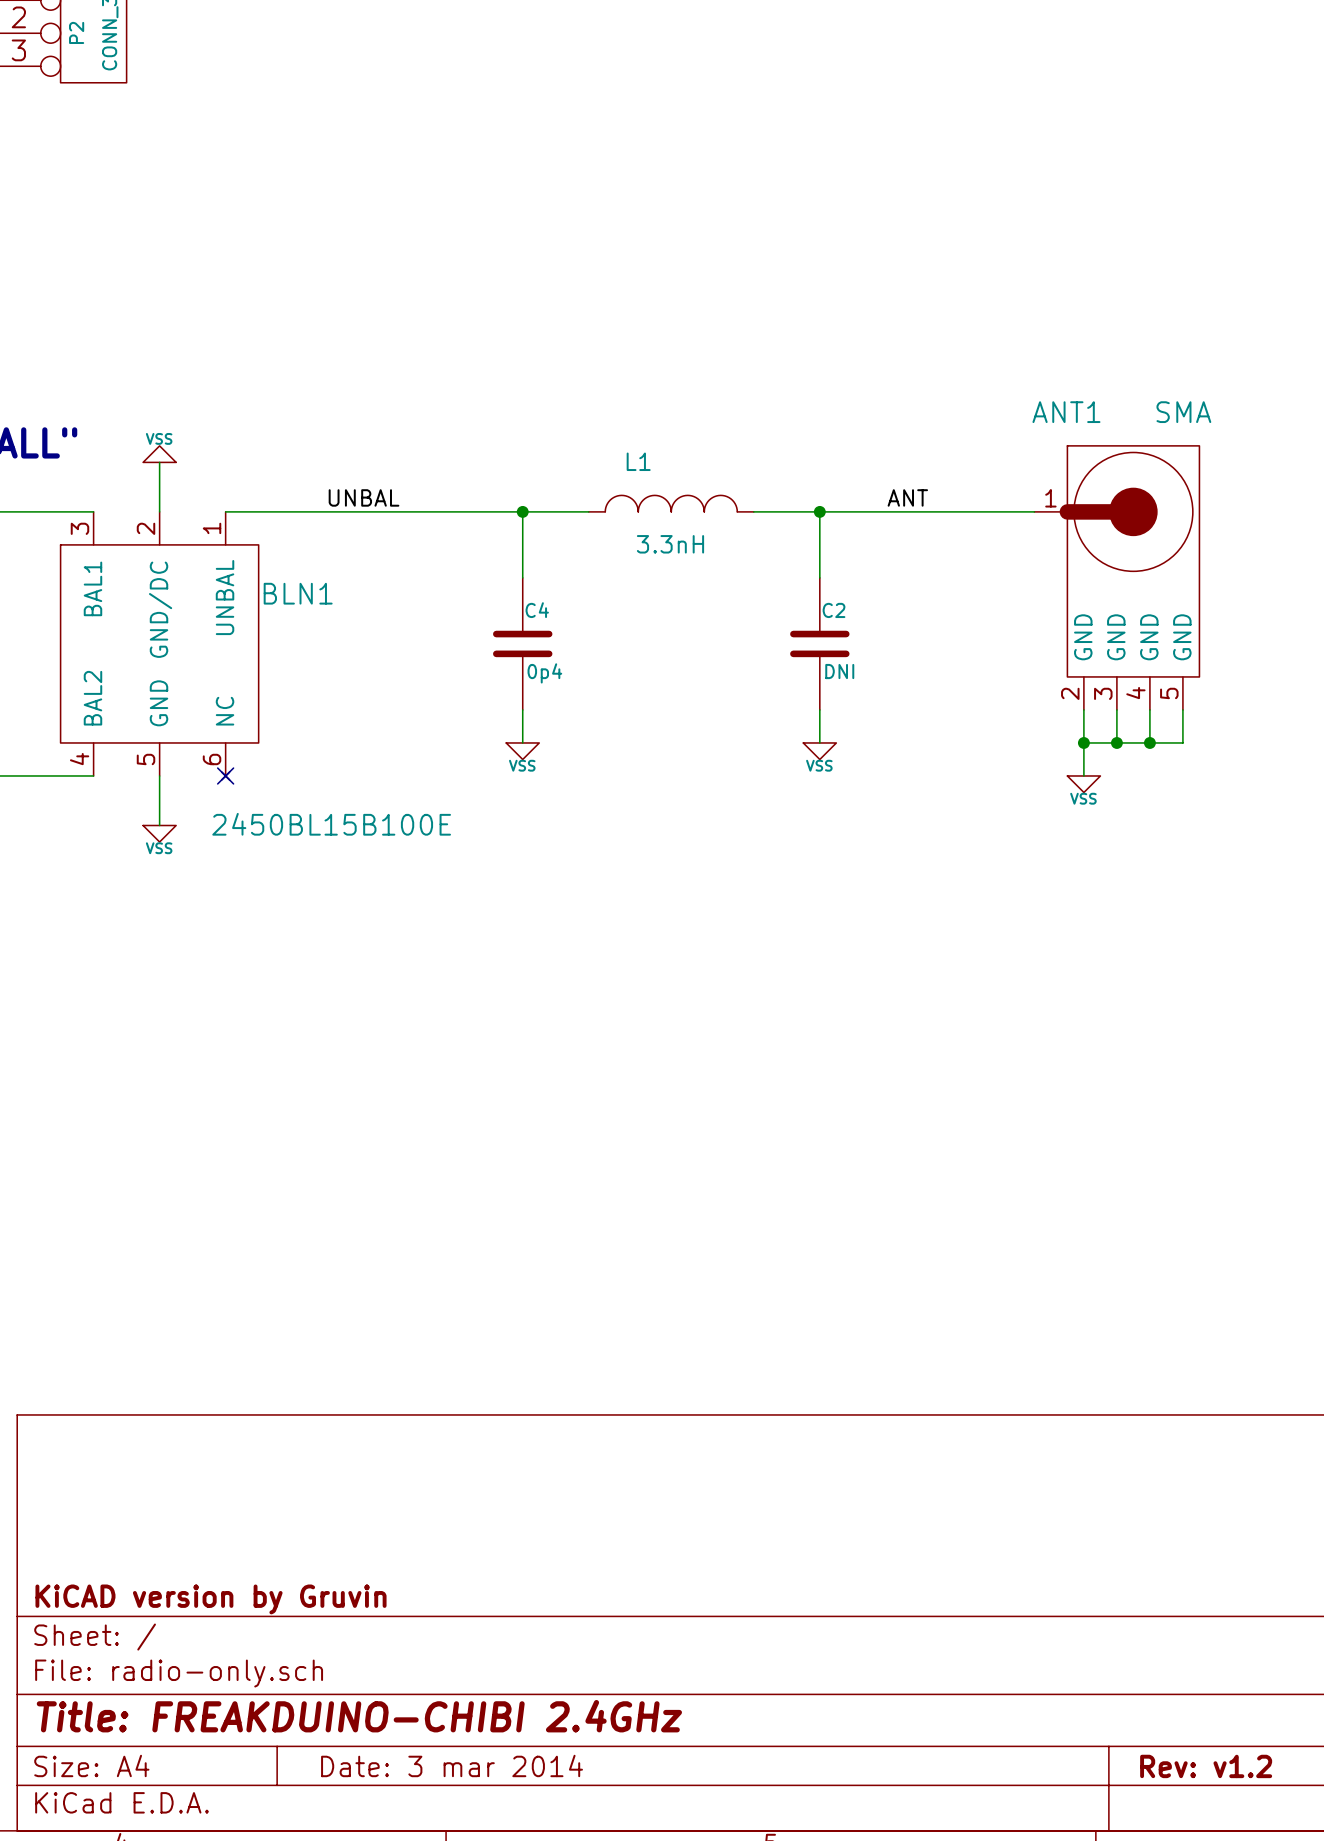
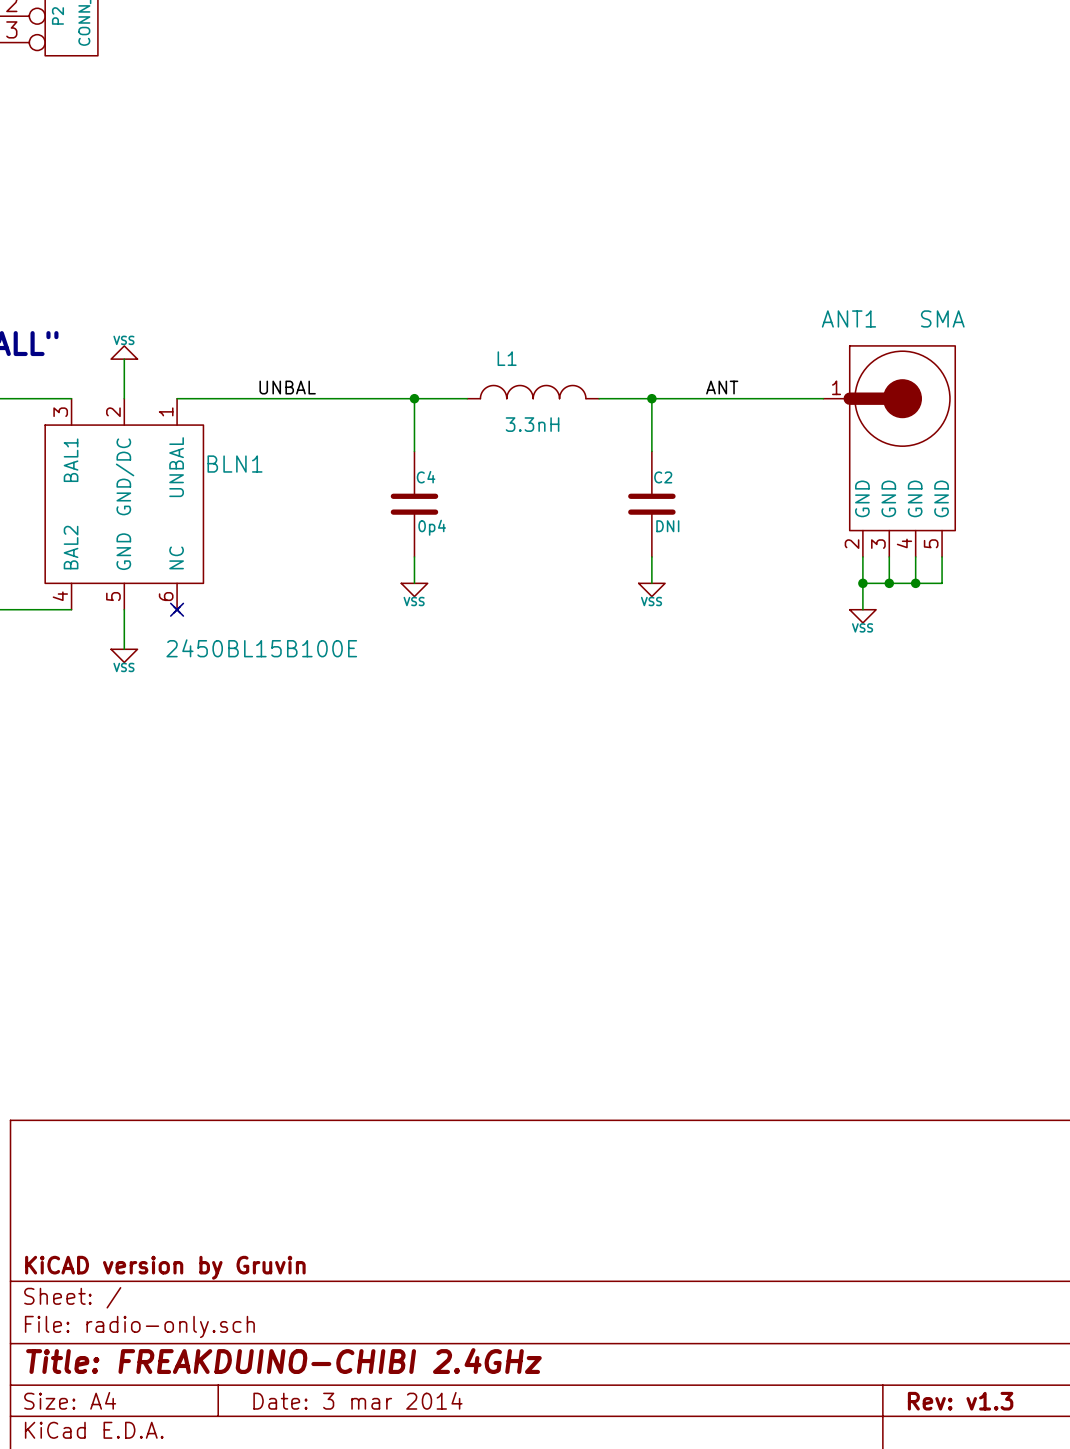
title block: Rev: v1.2 (1206, 1766) -> Rev: v1.3 (960, 1401)

